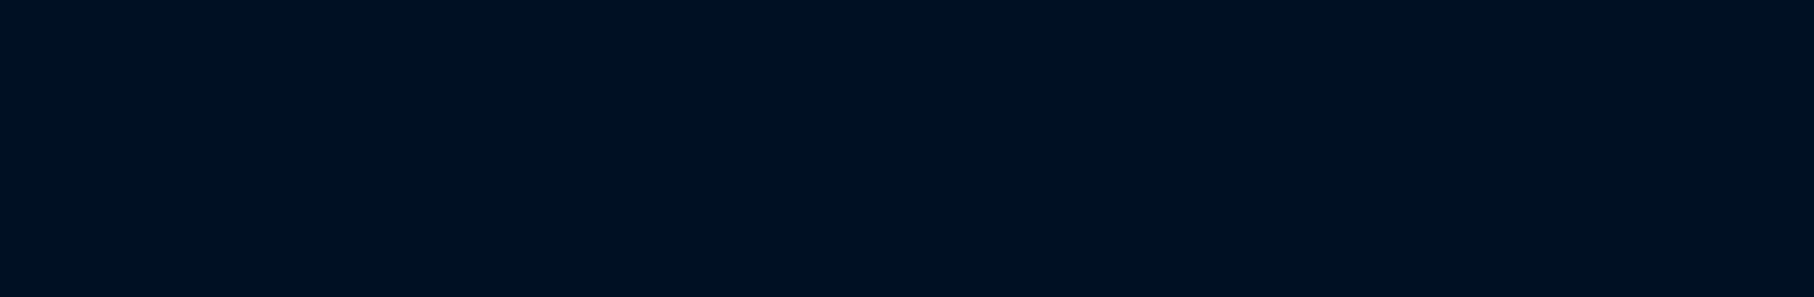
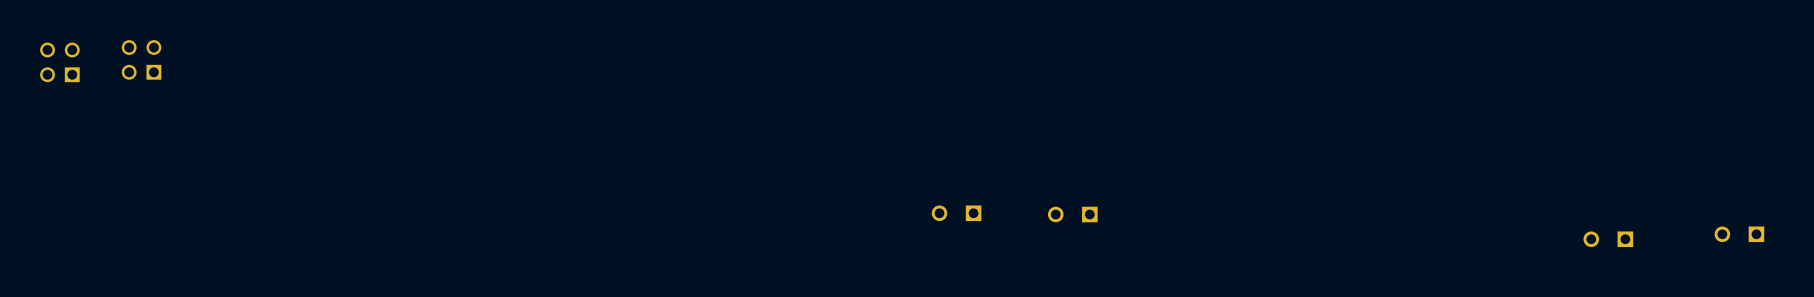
part: none -> (141, 59)
part: none -> (59, 62)
part: none -> (956, 213)
part: none -> (1072, 214)
part: none -> (1739, 234)
part: none -> (1608, 239)

